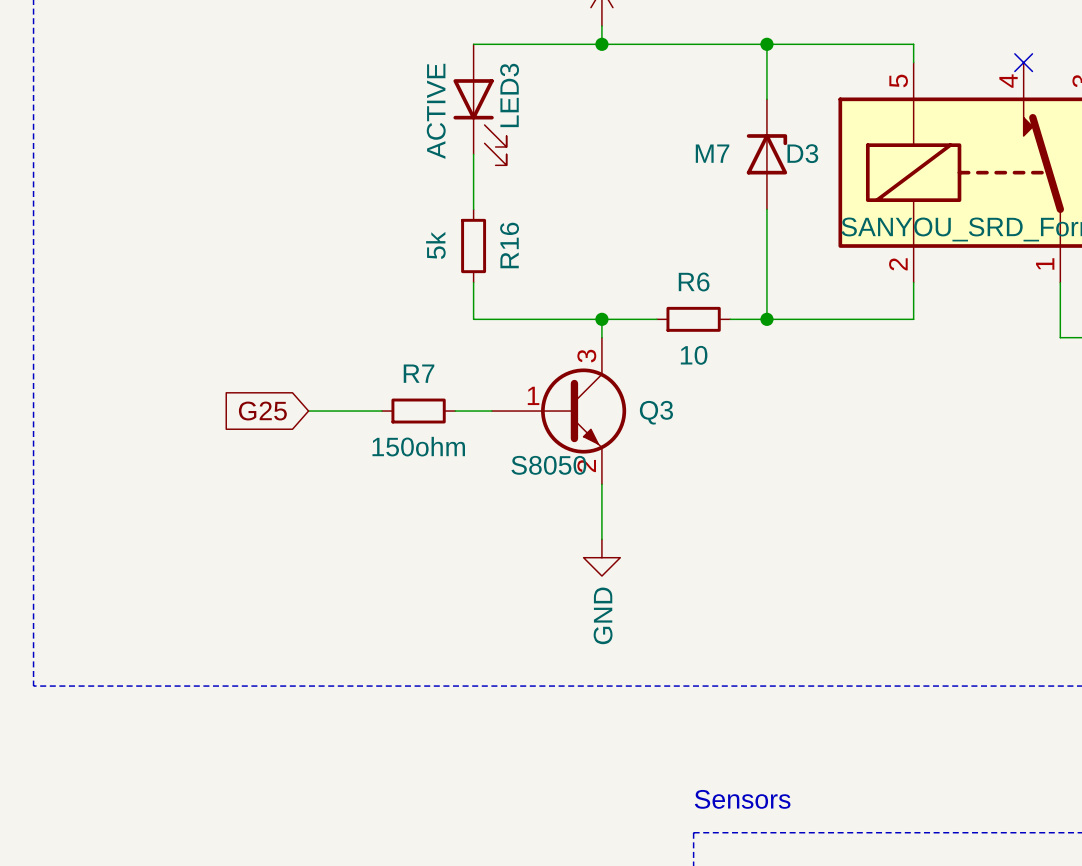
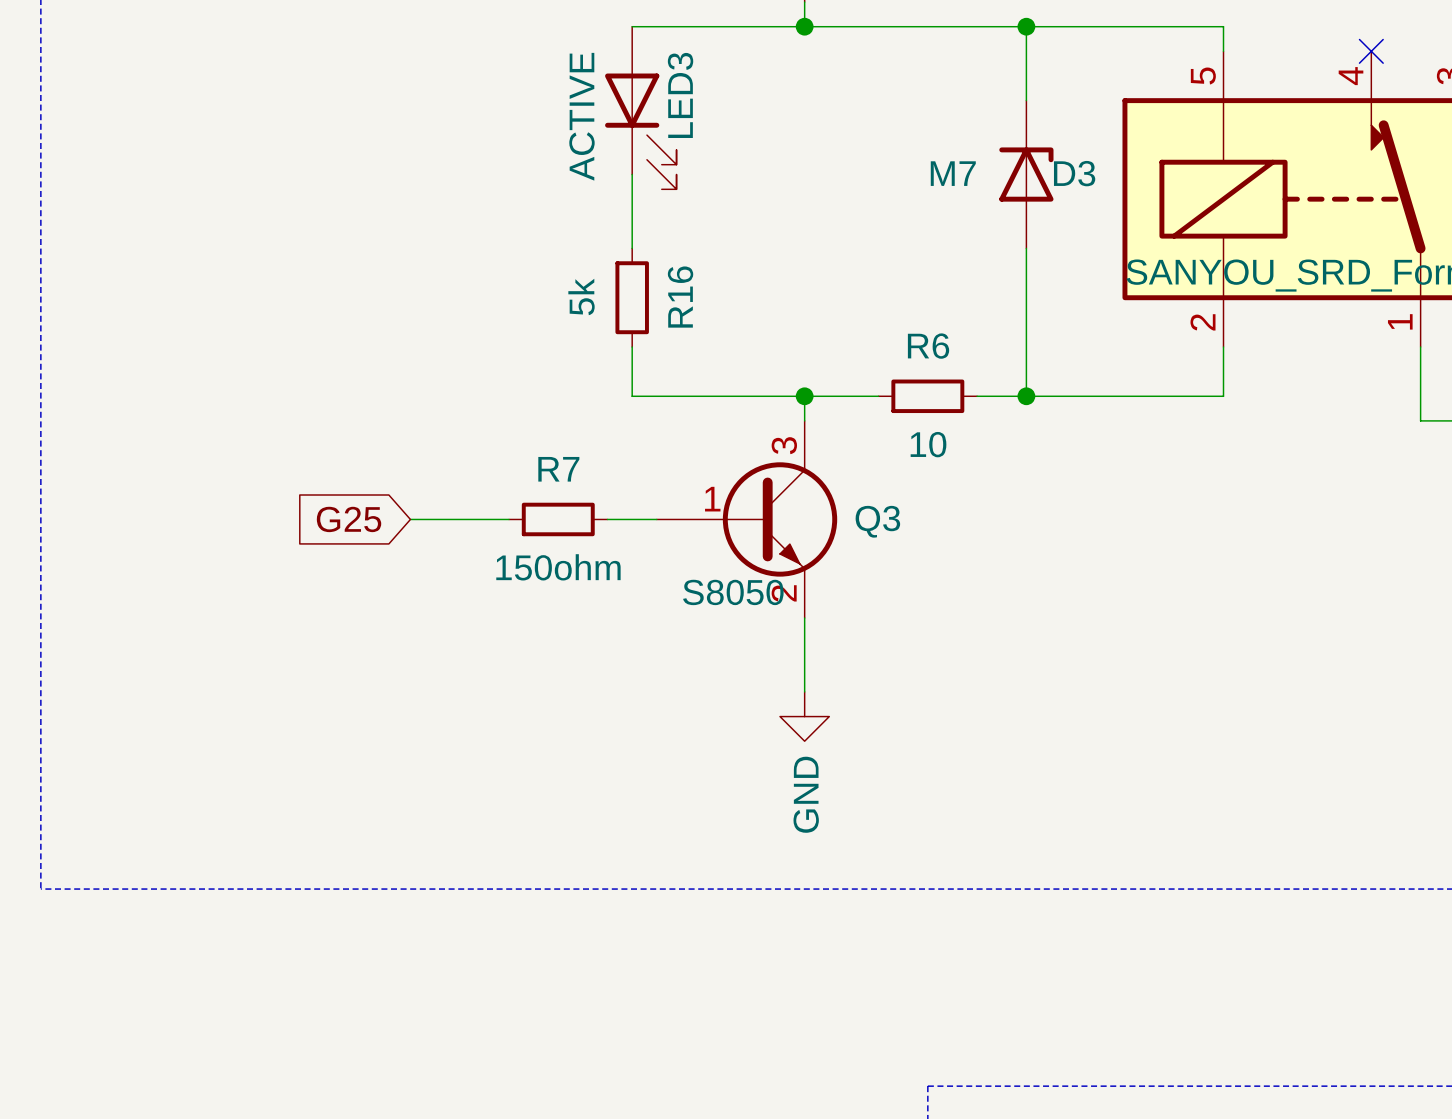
text: Sensors (742, 799) -> none

